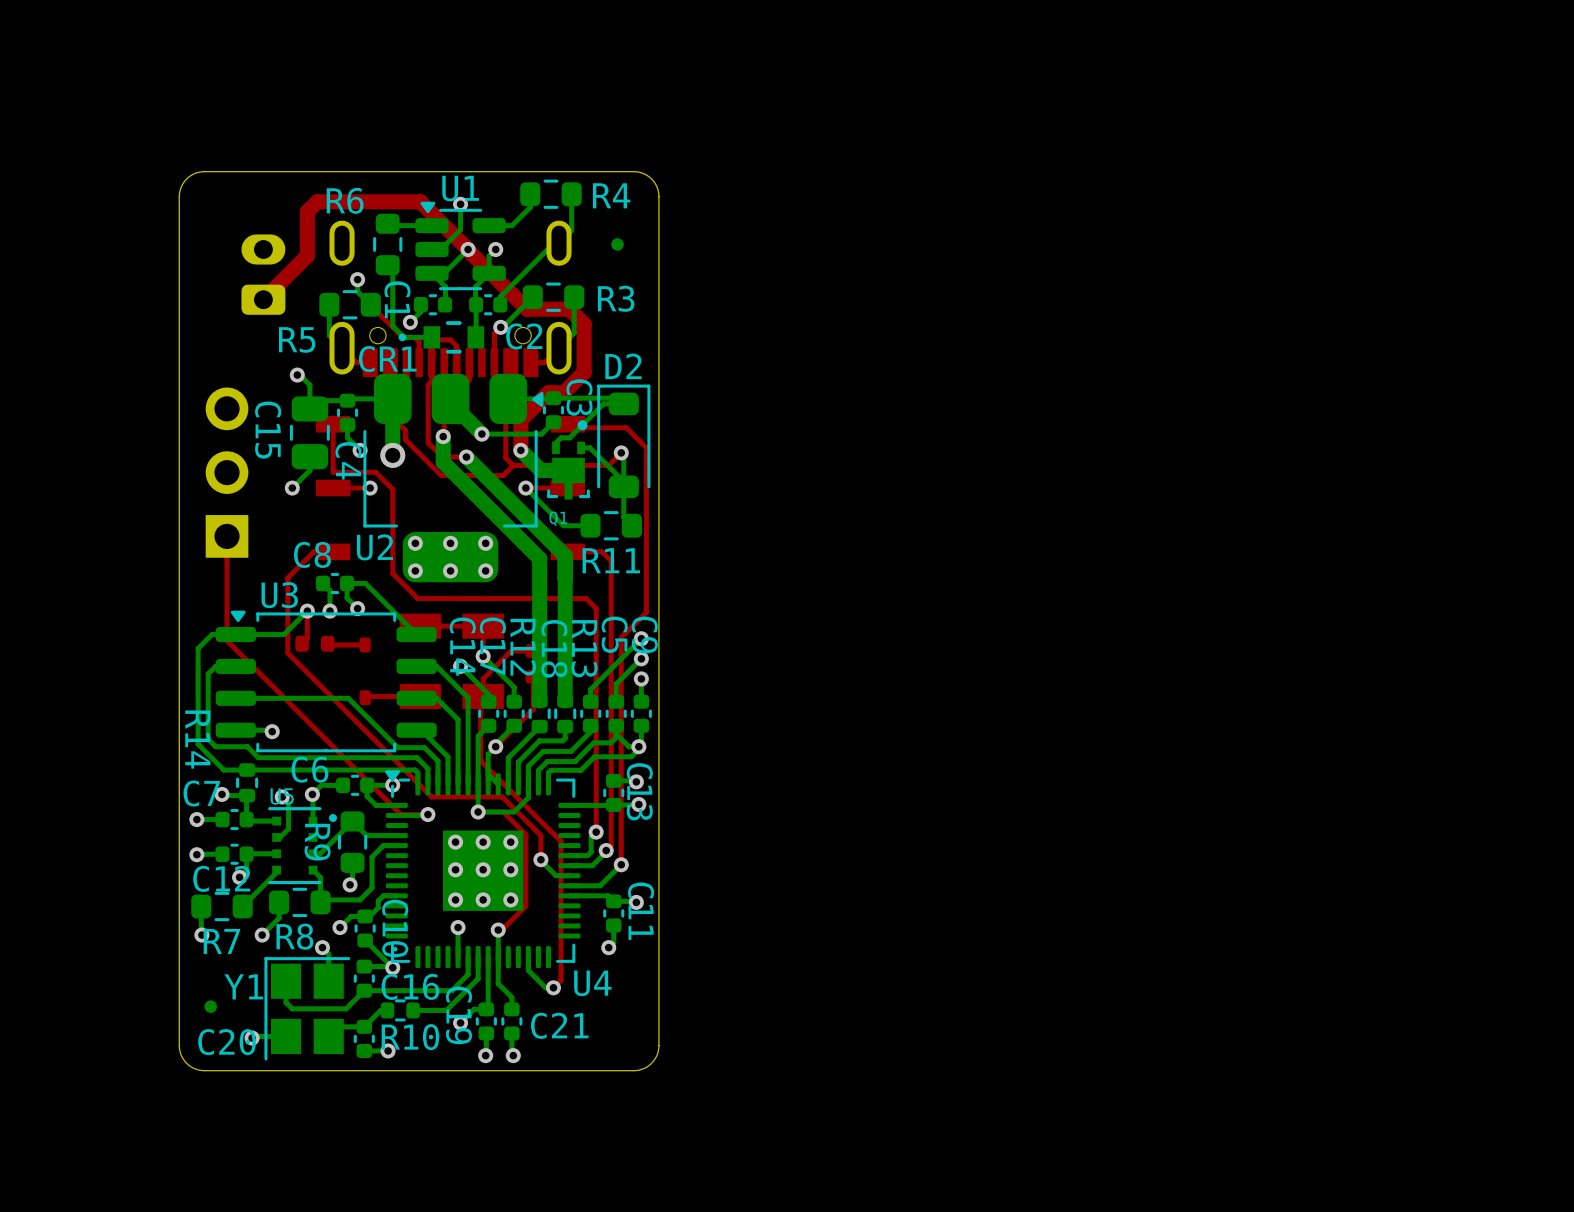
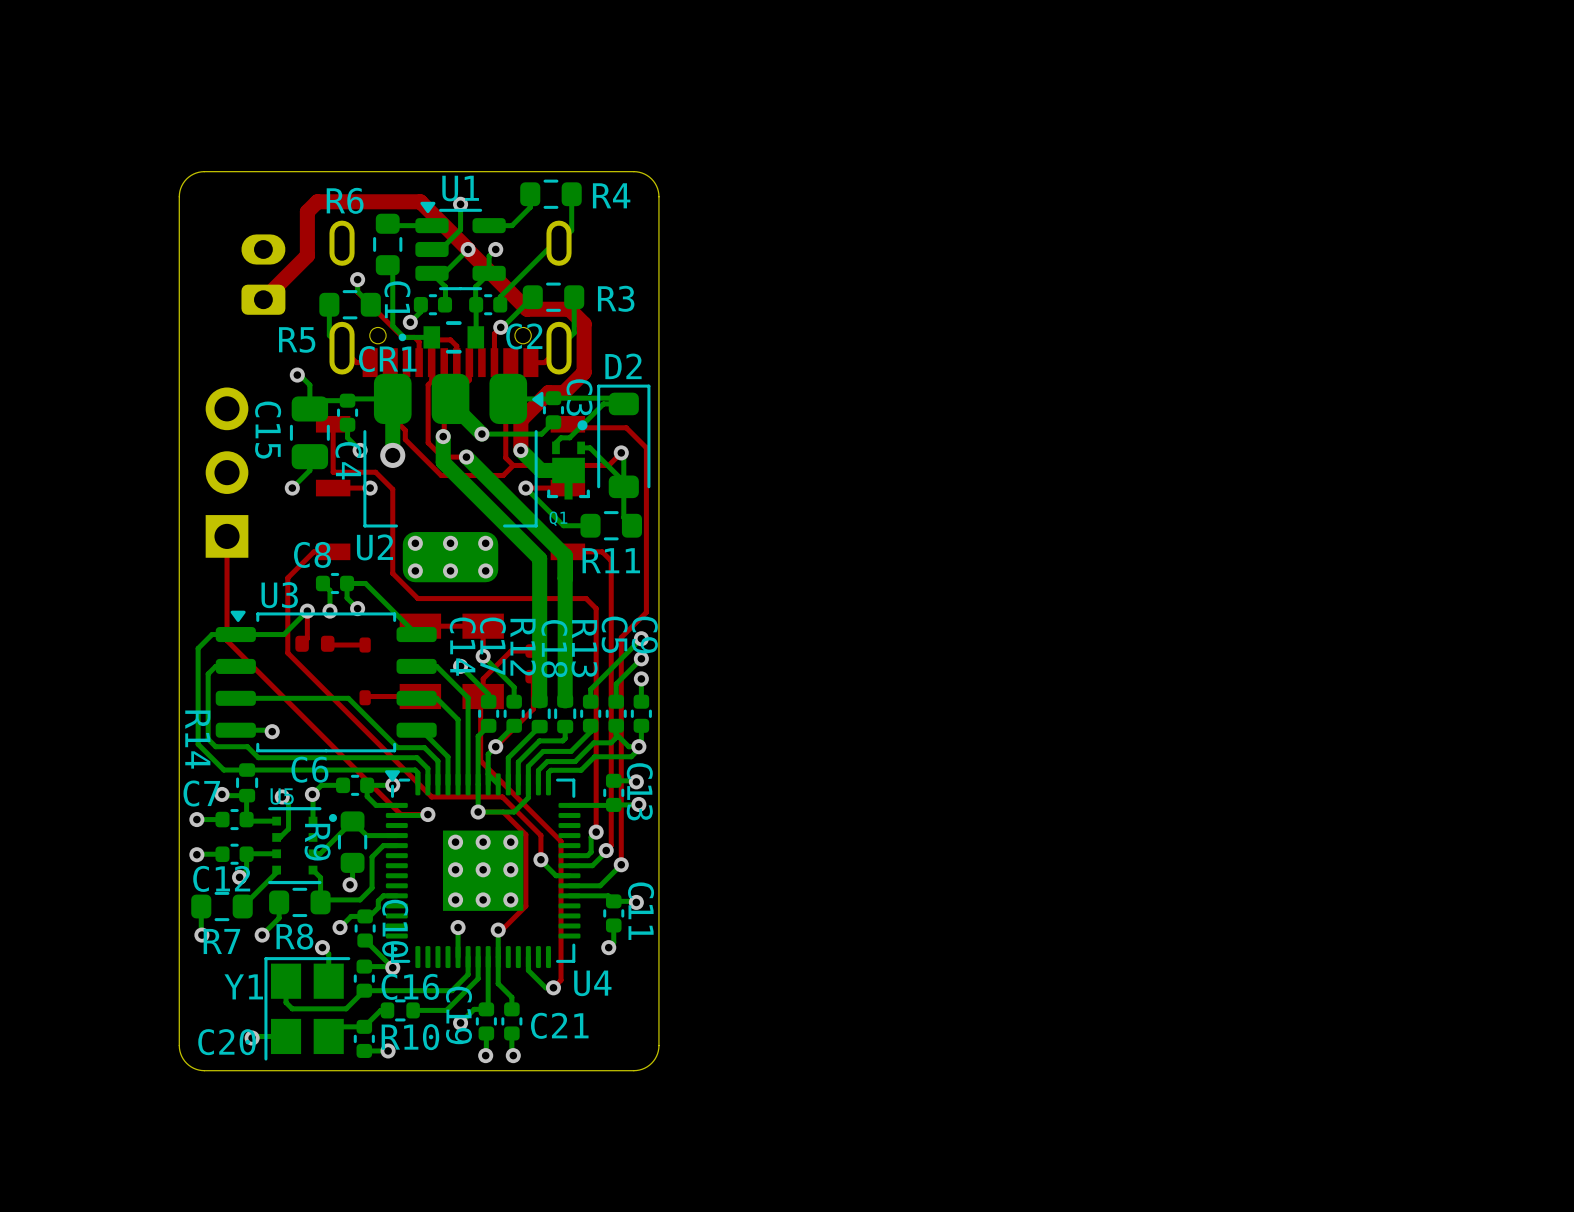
part: (617, 244) -> none
part: (210, 1006) -> none

